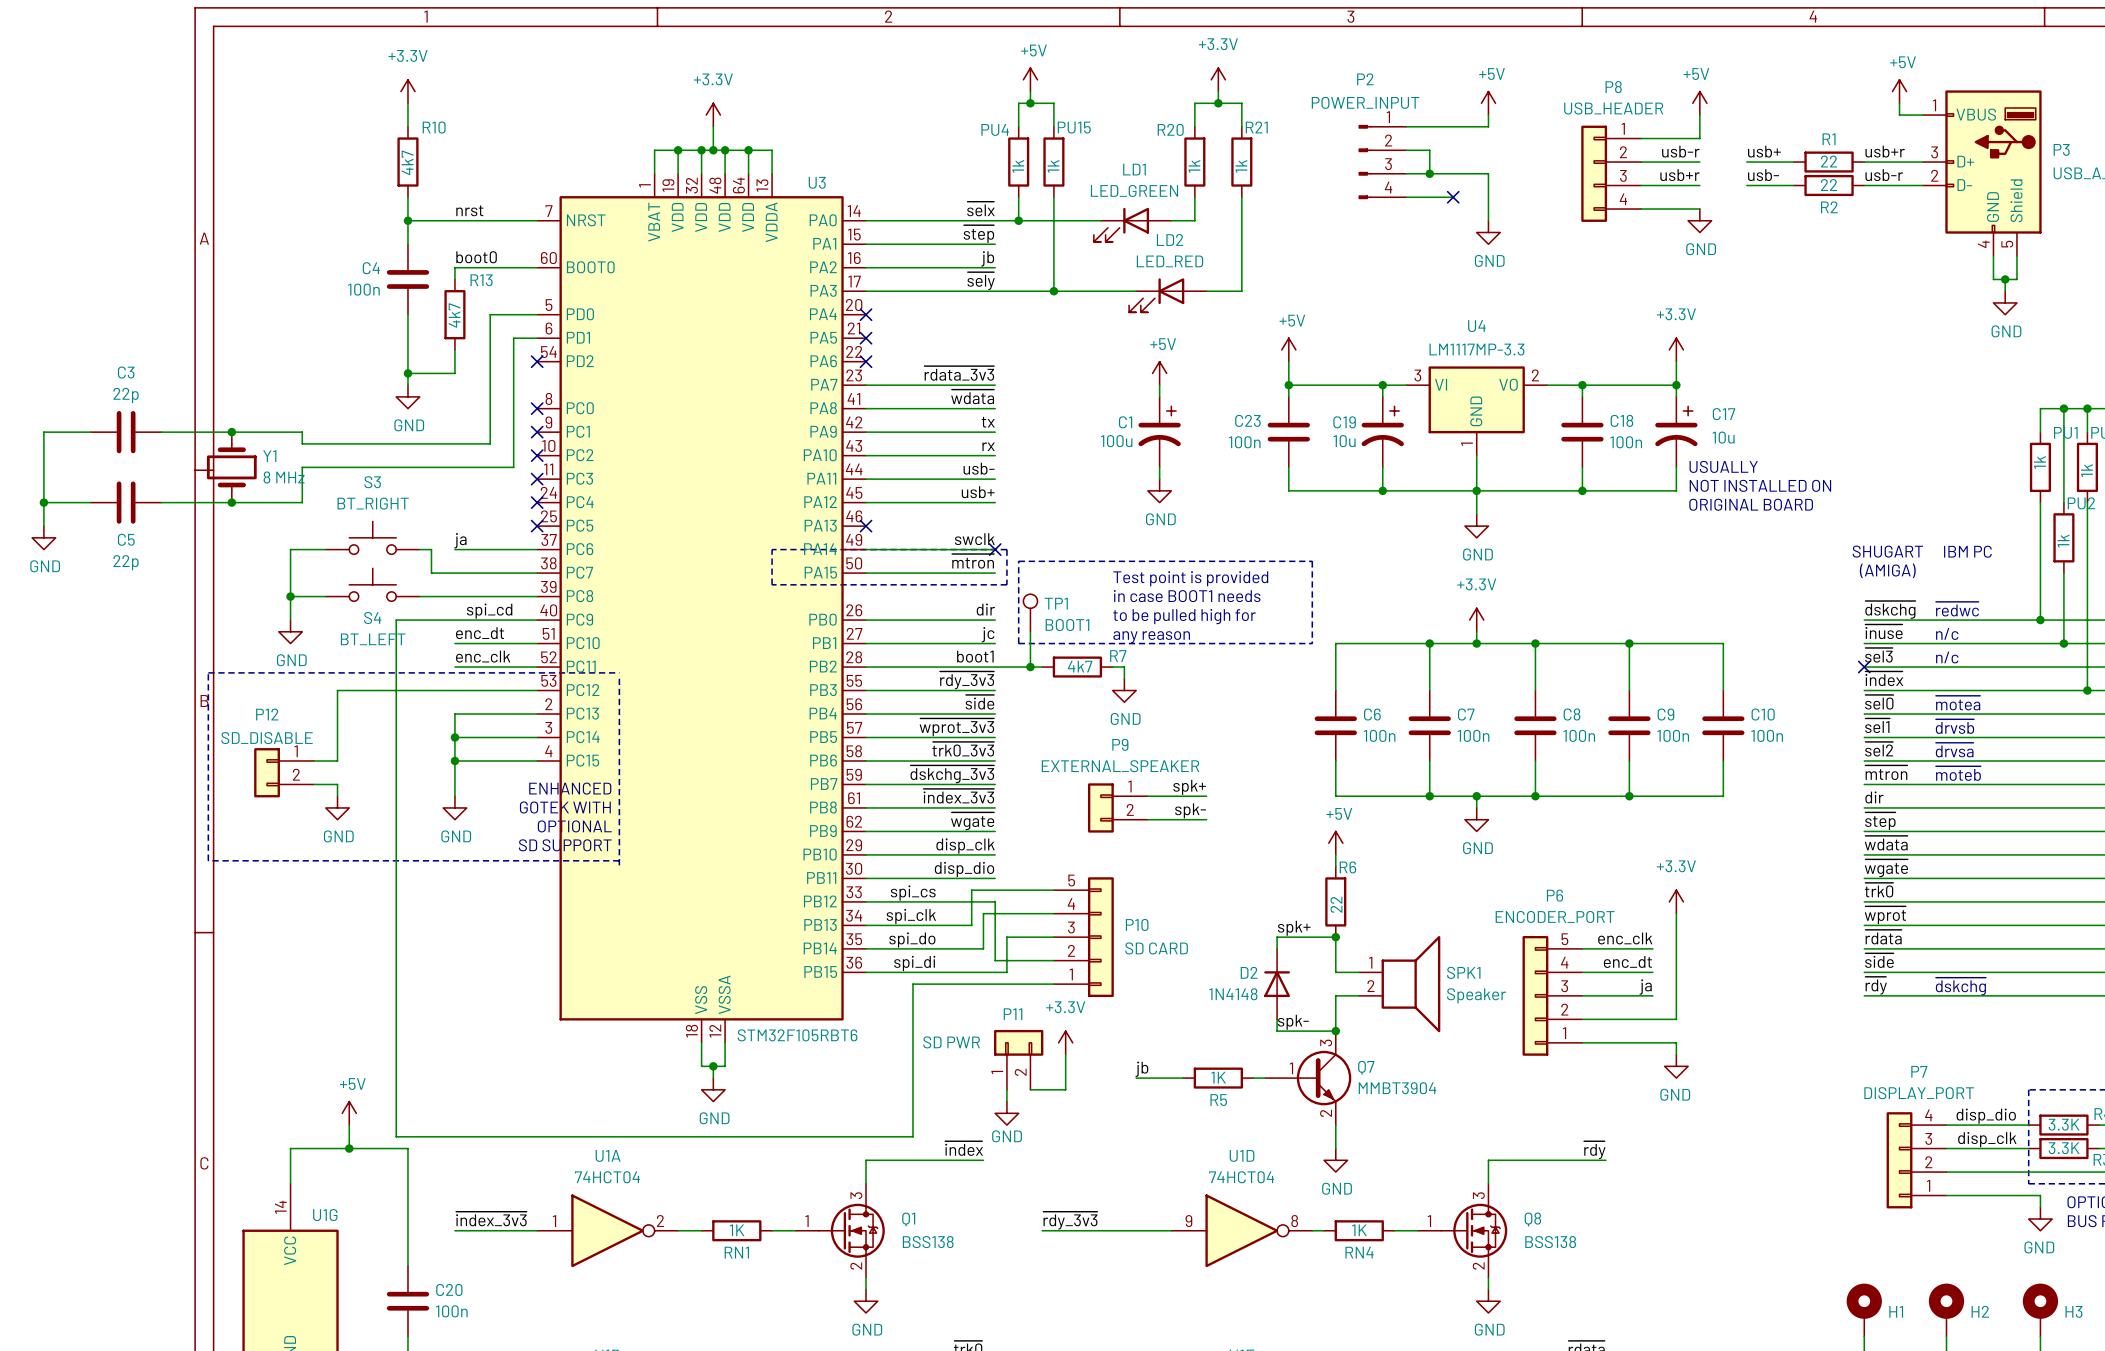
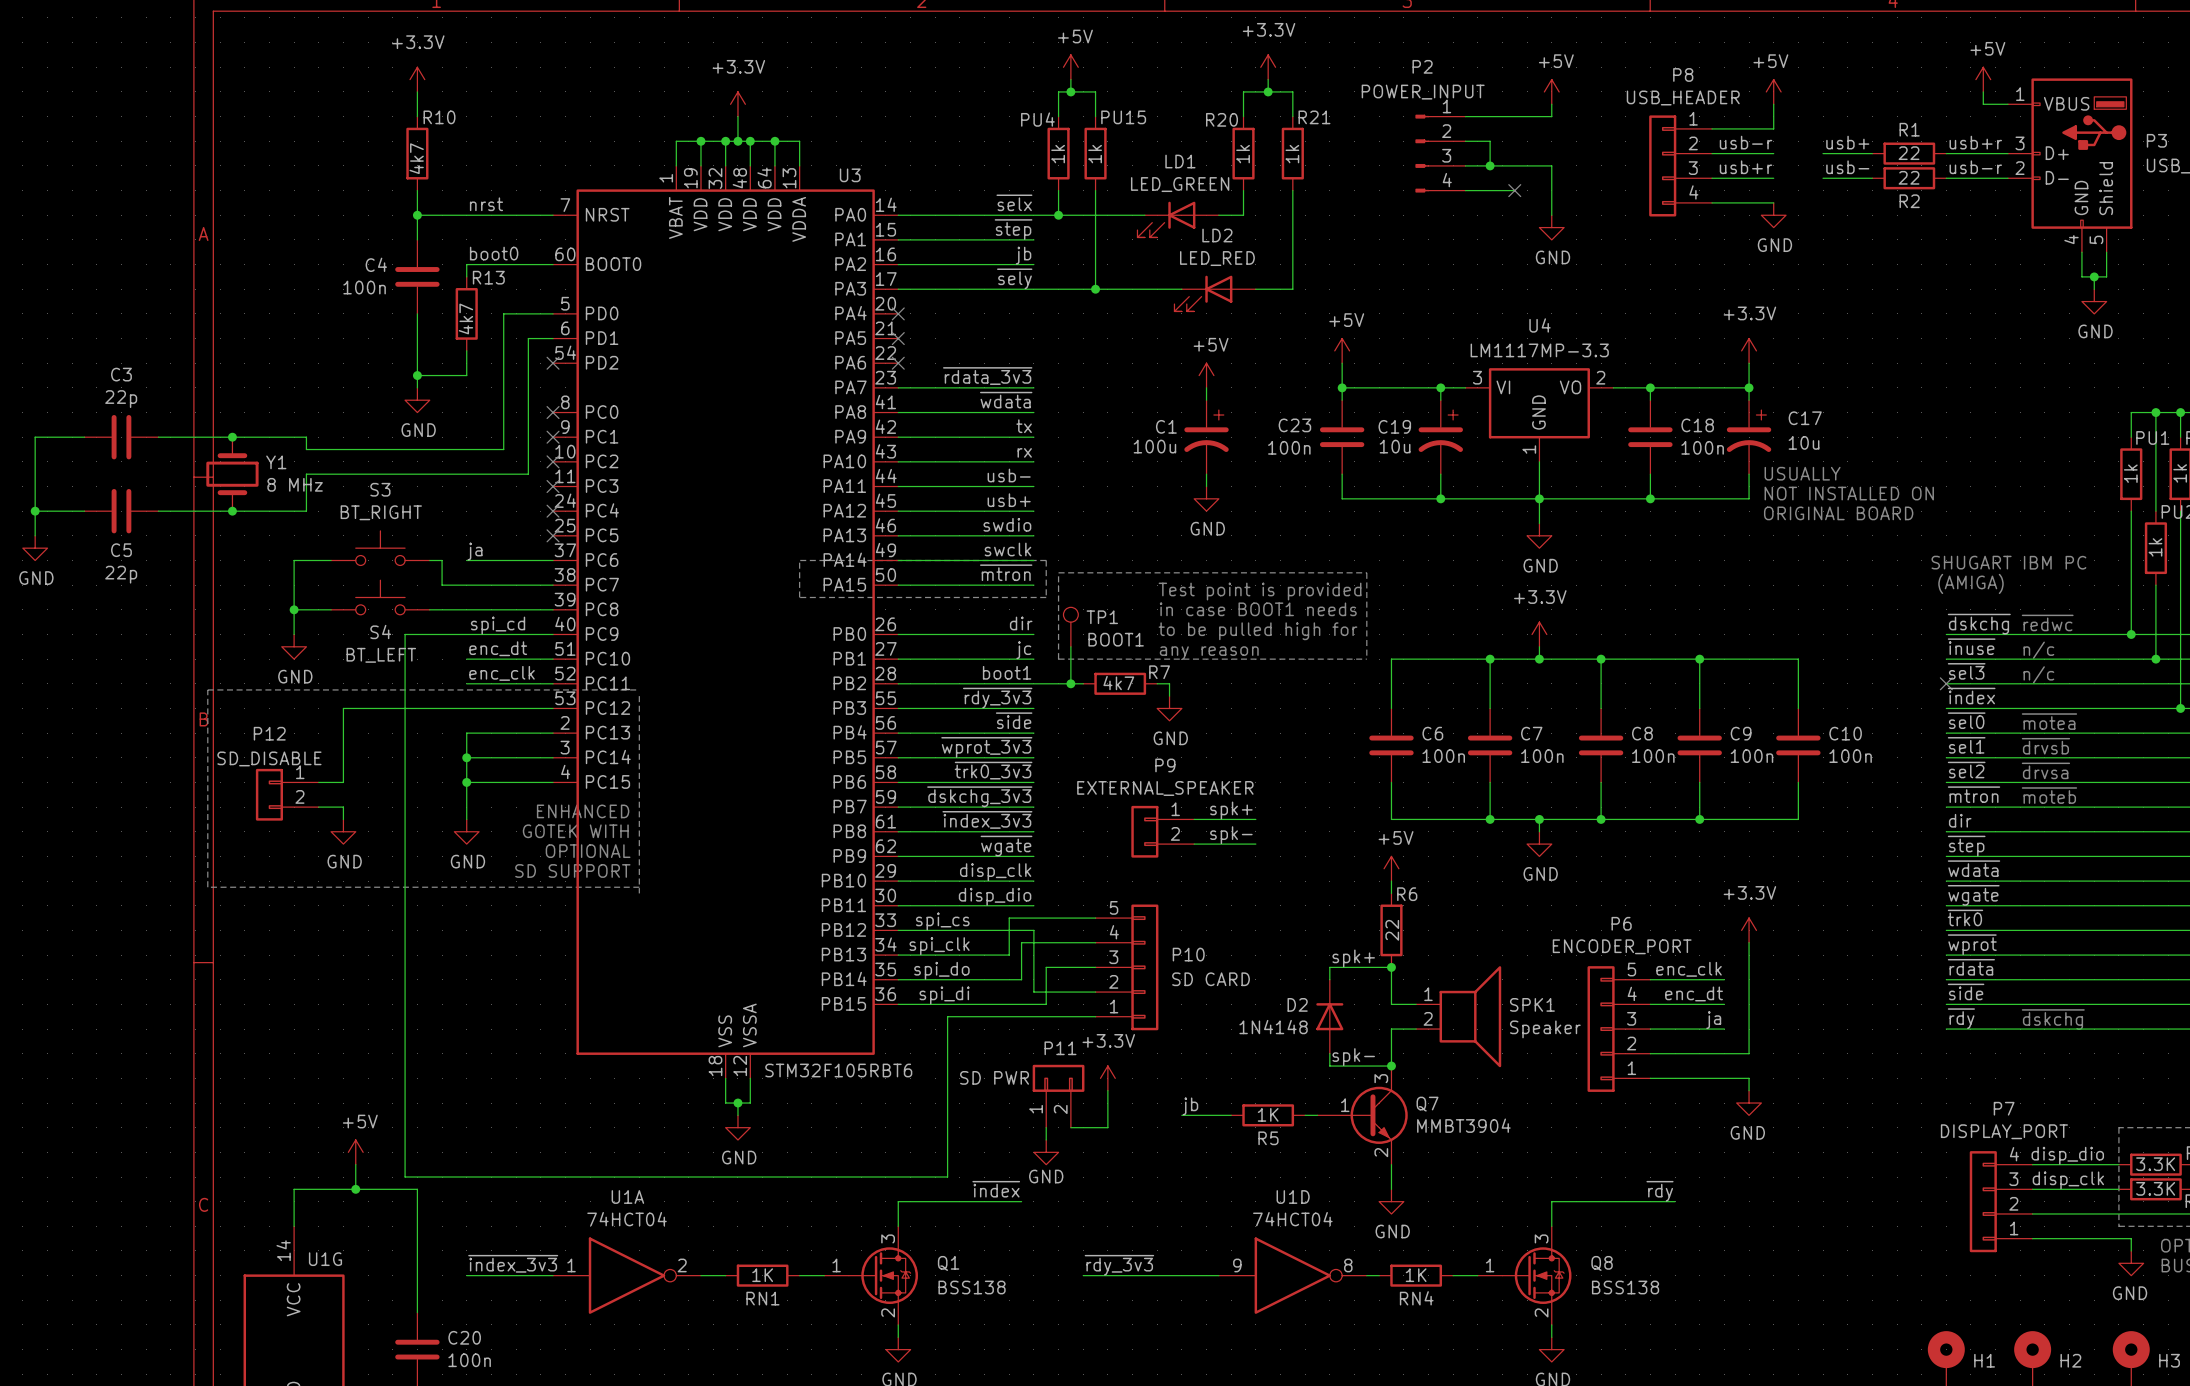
label: none -> swdio (1007, 524)
wire: none -> (898, 535) (1033, 535)
no-connect mark: (866, 526) -> none
no-connect mark: (995, 549) -> none

